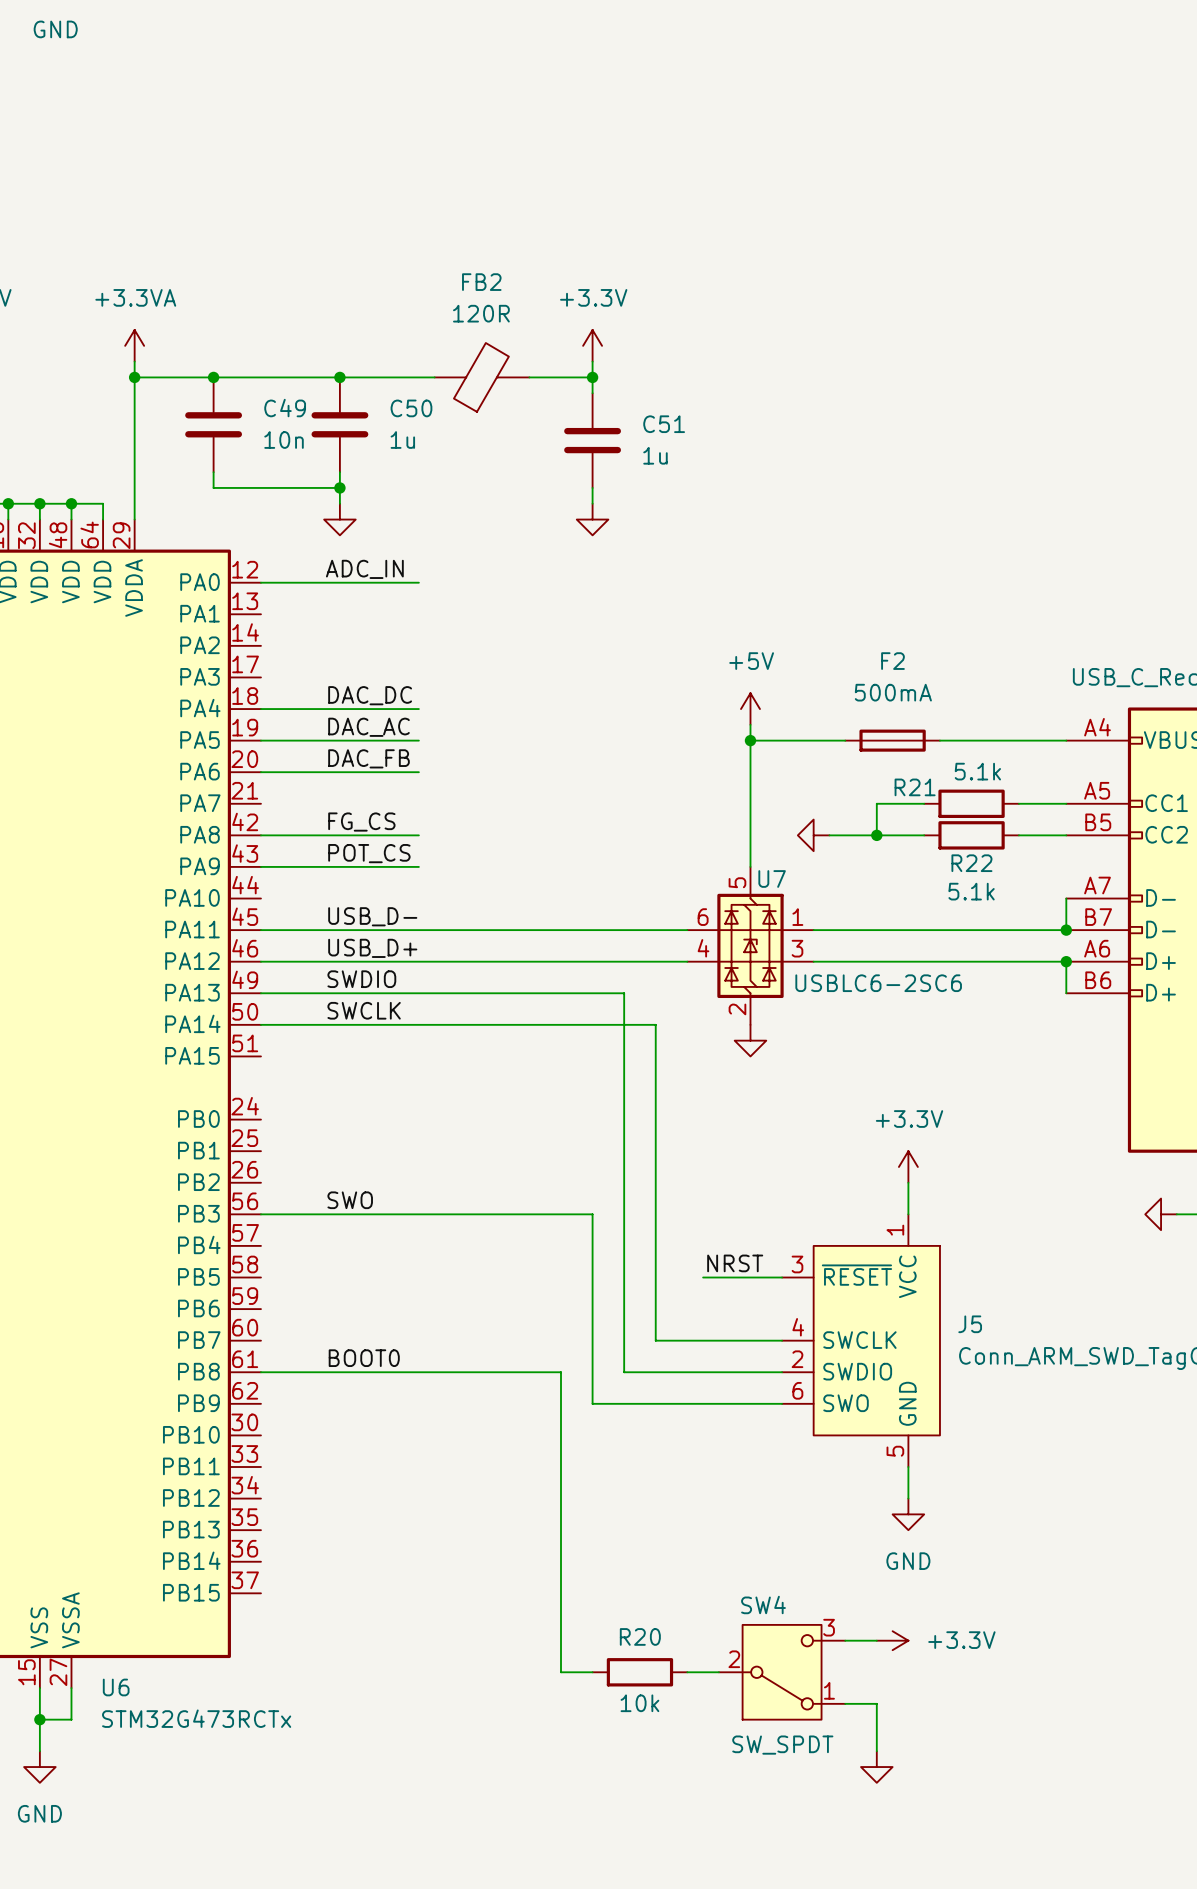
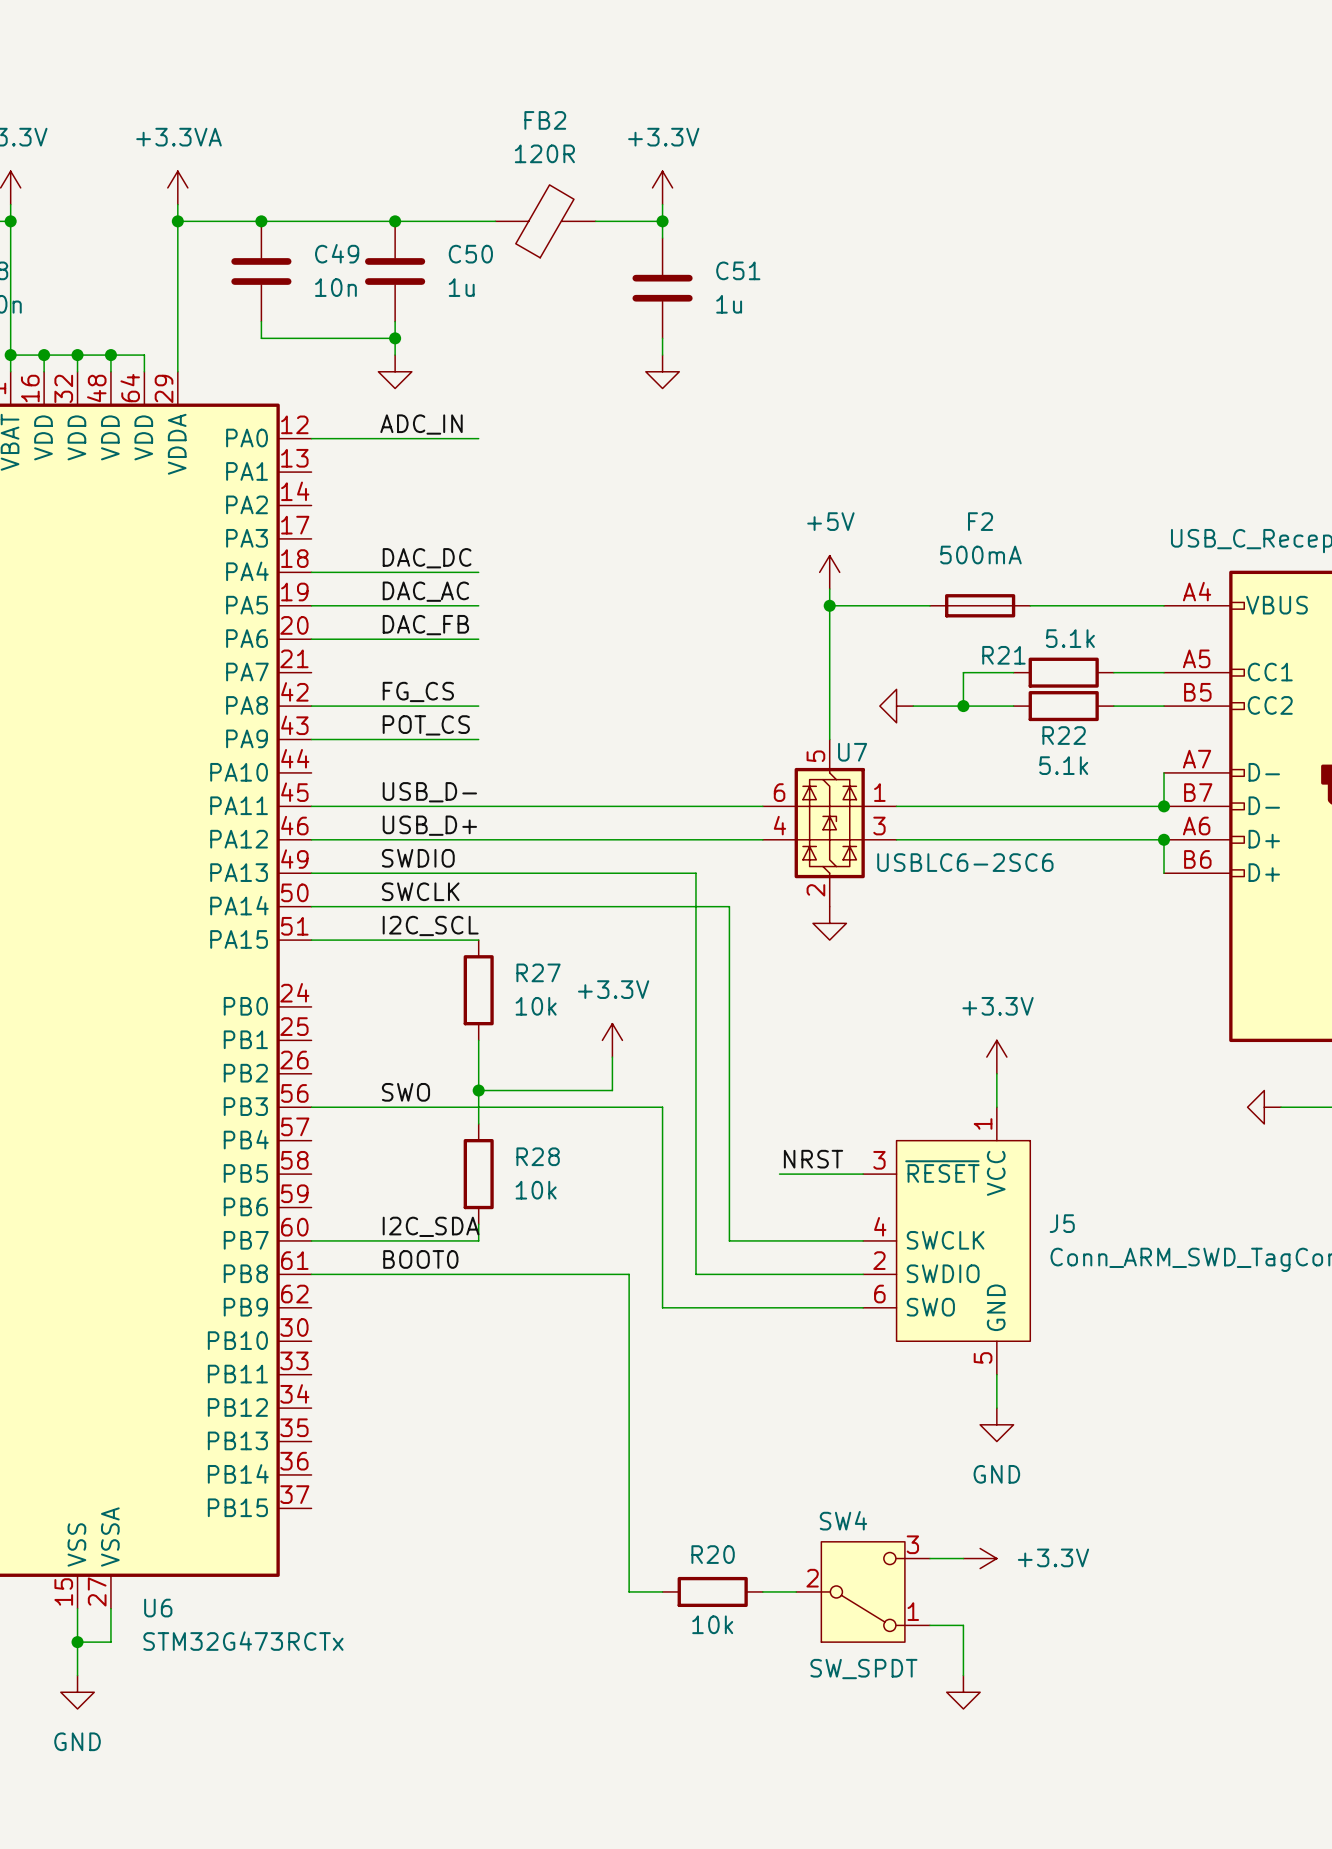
label: none -> I2C_SCL (430, 925)
wire: none -> (311, 940) (478, 940)
R27: none -> 10k (478, 990)
wire: none -> (478, 1040) (478, 1123)
power symbol: none -> +3.3V (612, 1040)
wire: none -> (612, 1057) (612, 1090) (478, 1090)
junction: none -> (478, 1090)
R28: none -> 10k (478, 1174)
wire: none -> (478, 1224) (478, 1240) (311, 1240)
label: none -> I2C_SDA (431, 1226)

